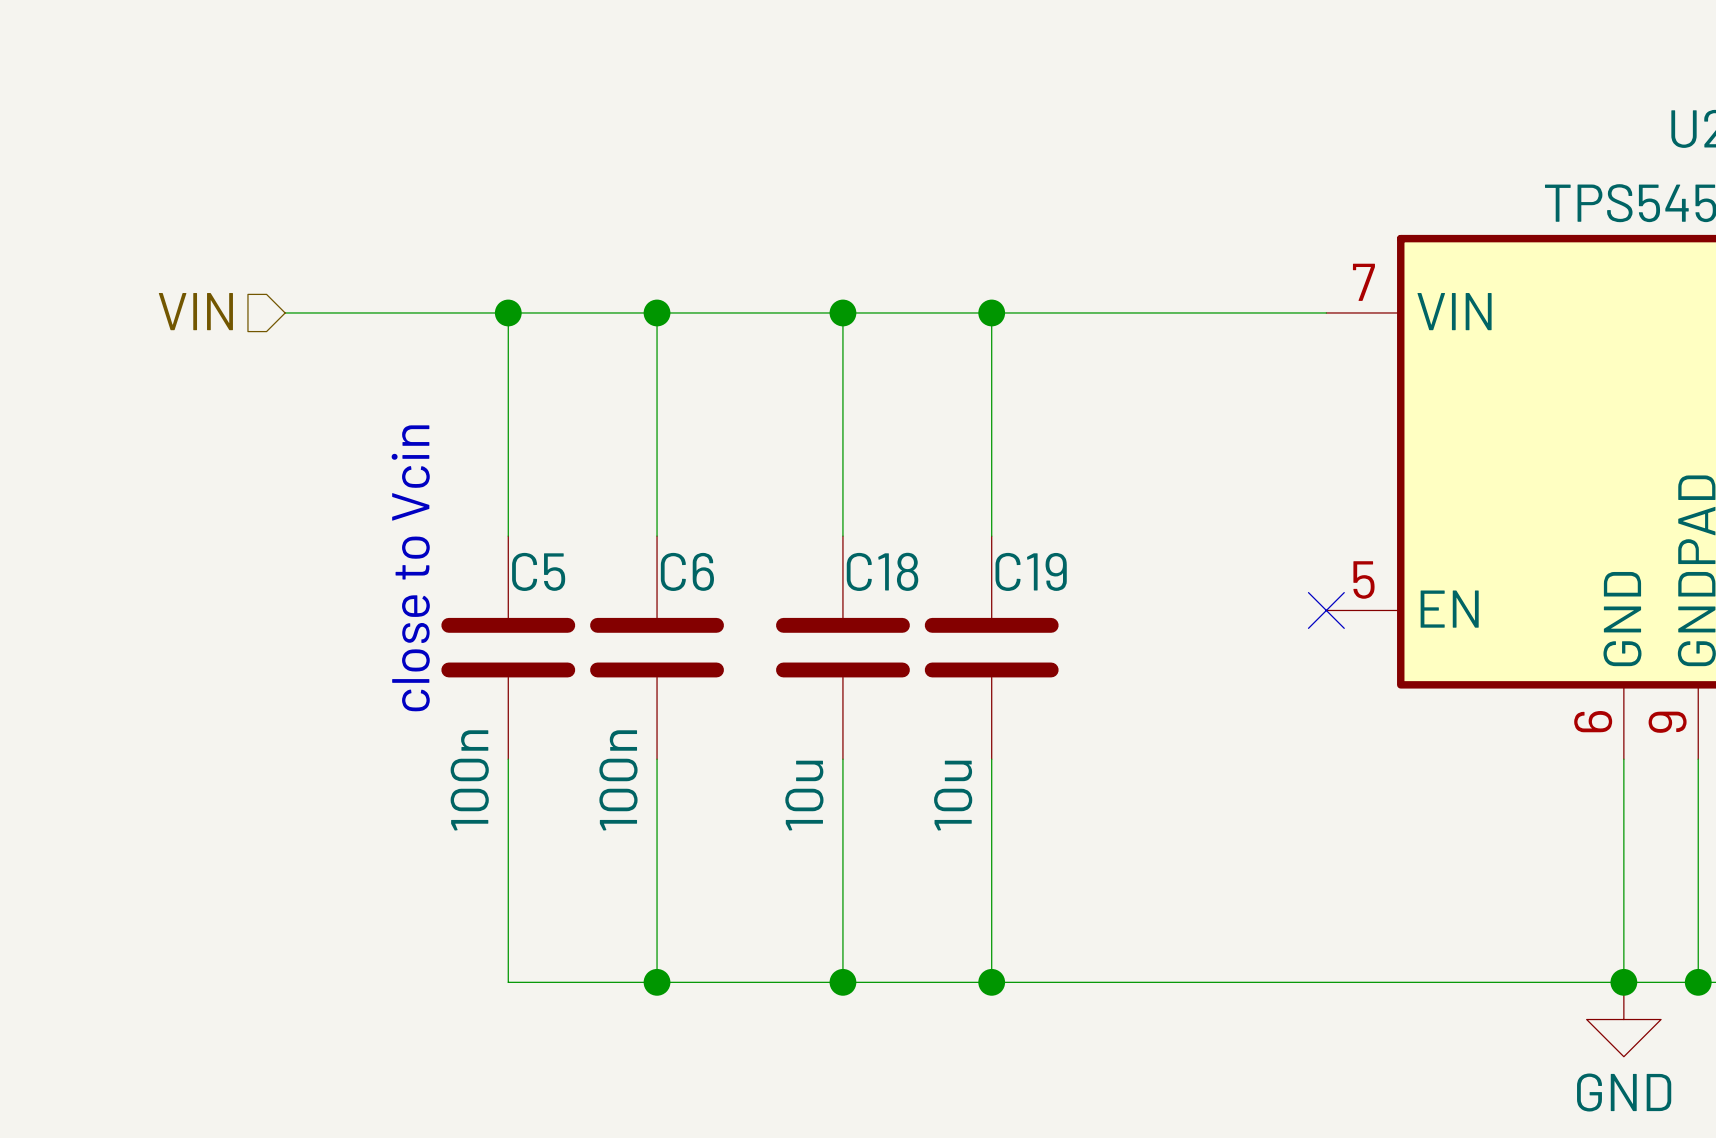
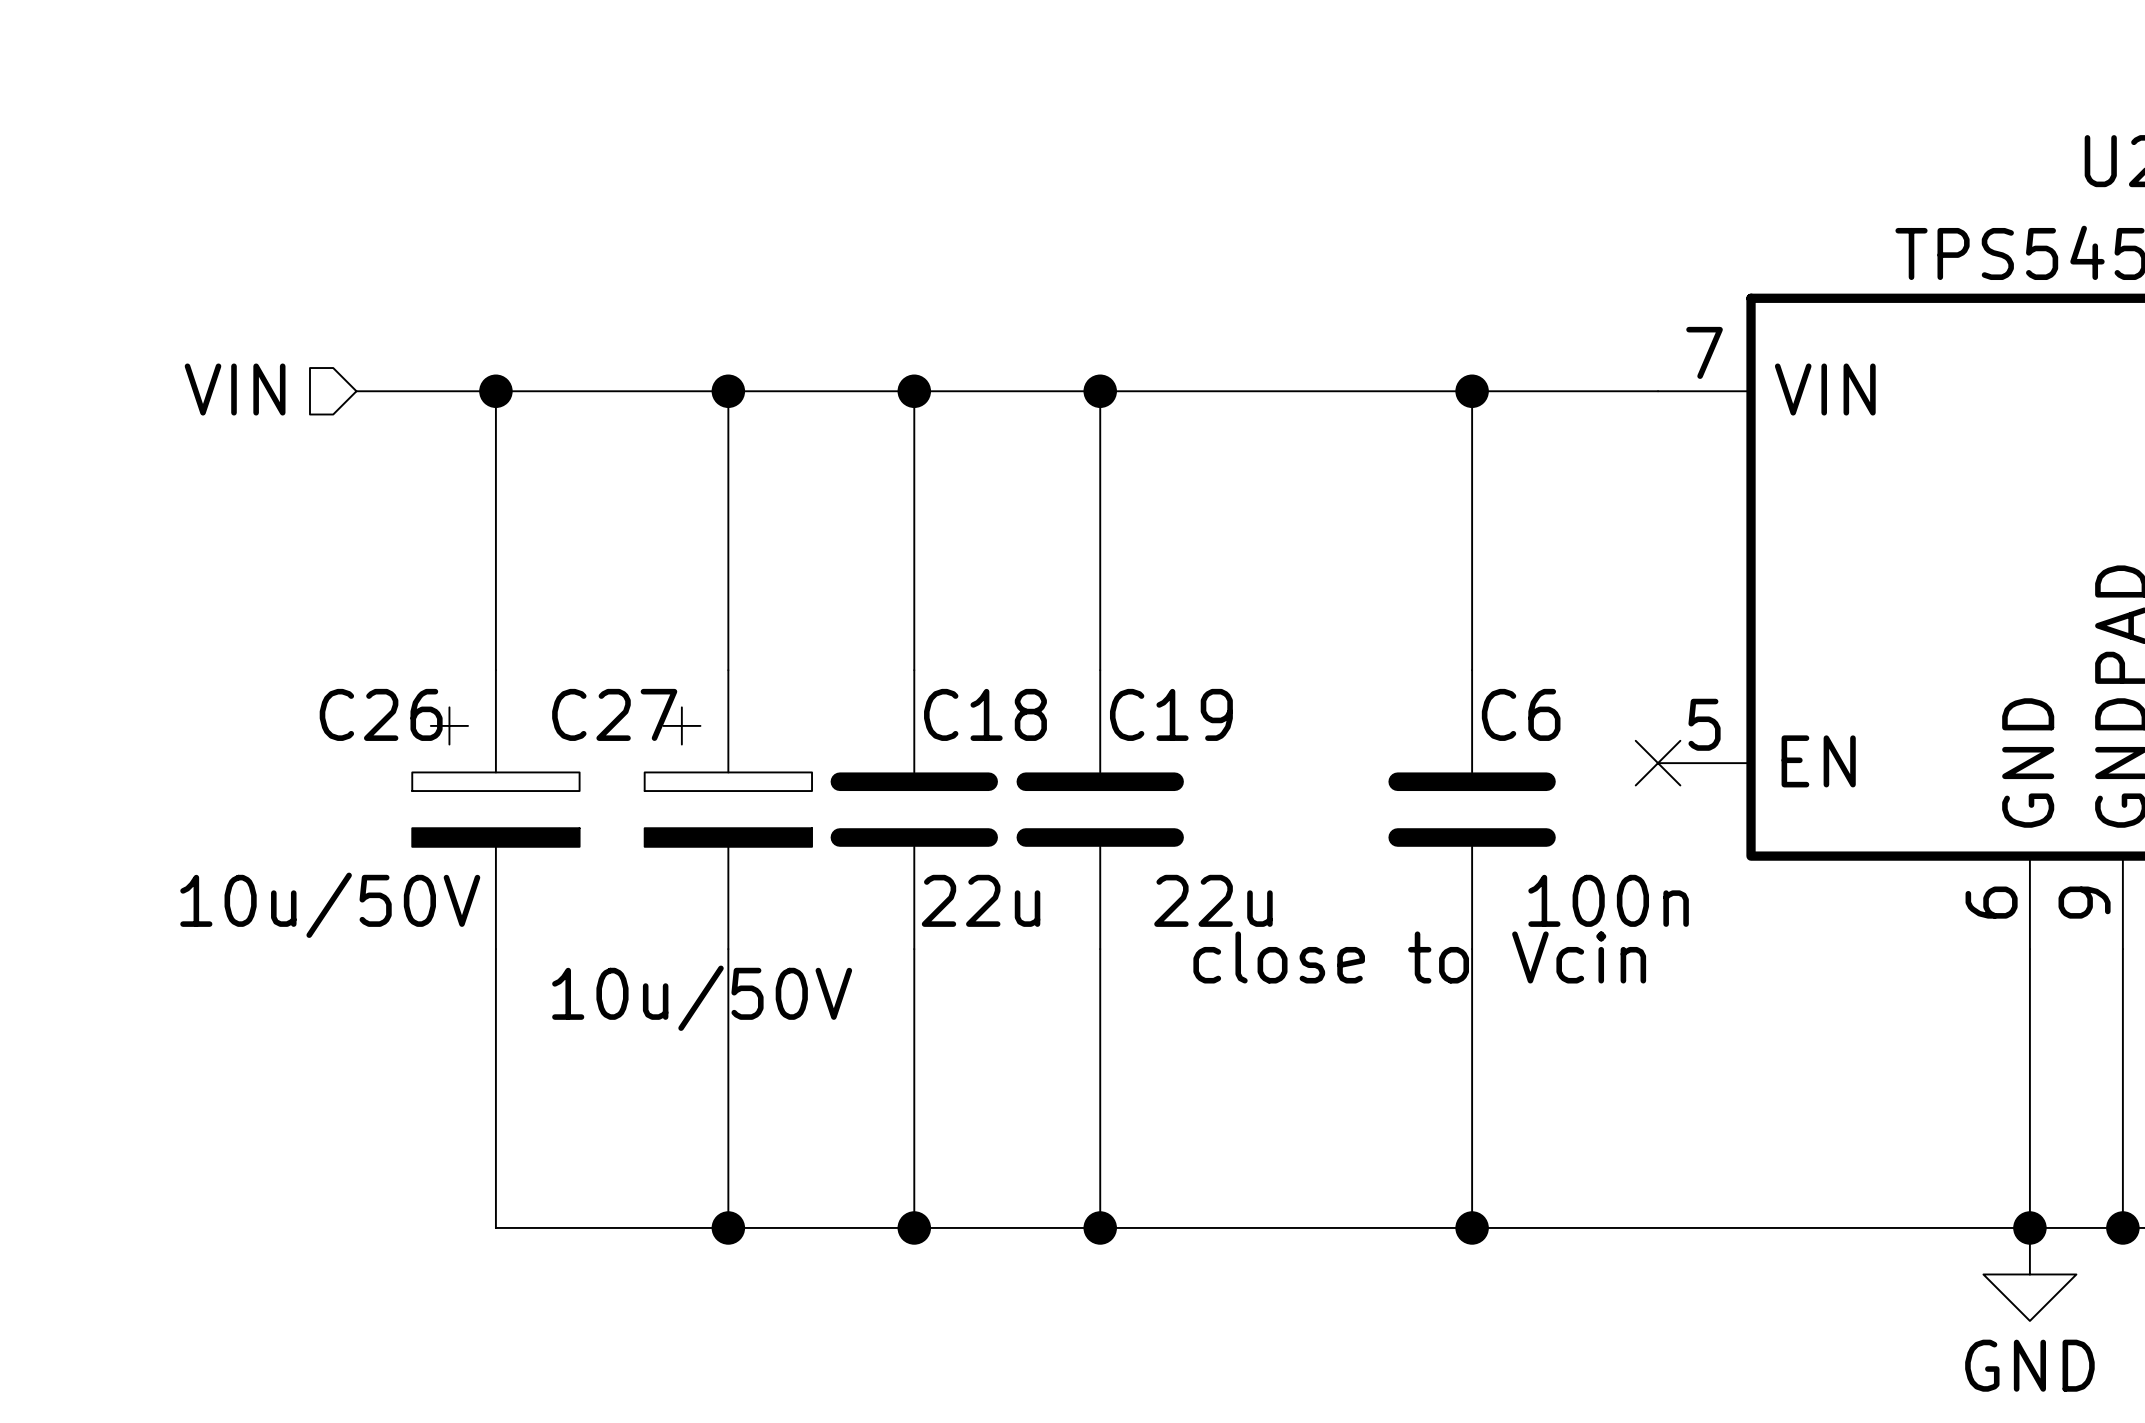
junction: none -> (495, 391)
wire: (508, 312) (508, 536) -> (495, 391) (495, 670)
junction: (508, 312) -> none
junction: none -> (728, 391)
wire: (657, 312) (657, 536) -> (728, 391) (728, 670)
junction: (657, 312) -> none
junction: none -> (914, 391)
wire: (842, 312) (842, 536) -> (914, 391) (914, 670)
junction position: (842, 312) -> (1100, 391)
wire: (991, 312) (991, 536) -> (1100, 391) (1100, 670)
junction: (991, 312) -> none
wire: none -> (1472, 391) (1472, 670)
junction: none -> (1472, 391)
text: close to Vcin (410, 568) -> none
C26: none -> 10u/50V (495, 809)
C5: 100n (508, 647) -> none
C27: none -> 10u/50V (728, 809)
C6 position: (657, 647) -> (1472, 809)
C18 position: (842, 647) -> (914, 809)
C19 position: (991, 647) -> (1100, 809)
wire: (508, 759) (508, 982) -> (495, 949) (495, 1227) (635, 1227)
wire: (657, 759) (657, 982) -> (728, 949) (728, 1227)
wire: (842, 759) (842, 982) -> (914, 949) (914, 1227)
wire: (991, 759) (991, 982) -> (1100, 949) (1100, 1227)
wire: none -> (1472, 949) (1472, 1227)
text: none -> close to Vcin (1419, 957)
C6 value rotation: 0° (618, 780) -> 90° clockwise (1608, 900)
C18 value: 10u (804, 795) -> 22u (981, 900)
C19 value: 10u (953, 795) -> 22u (1213, 900)
junction: none -> (728, 1227)
junction: (657, 982) -> none
junction: none -> (914, 1227)
junction position: (842, 982) -> (1100, 1227)
junction: (991, 982) -> none
junction: none -> (1472, 1227)

